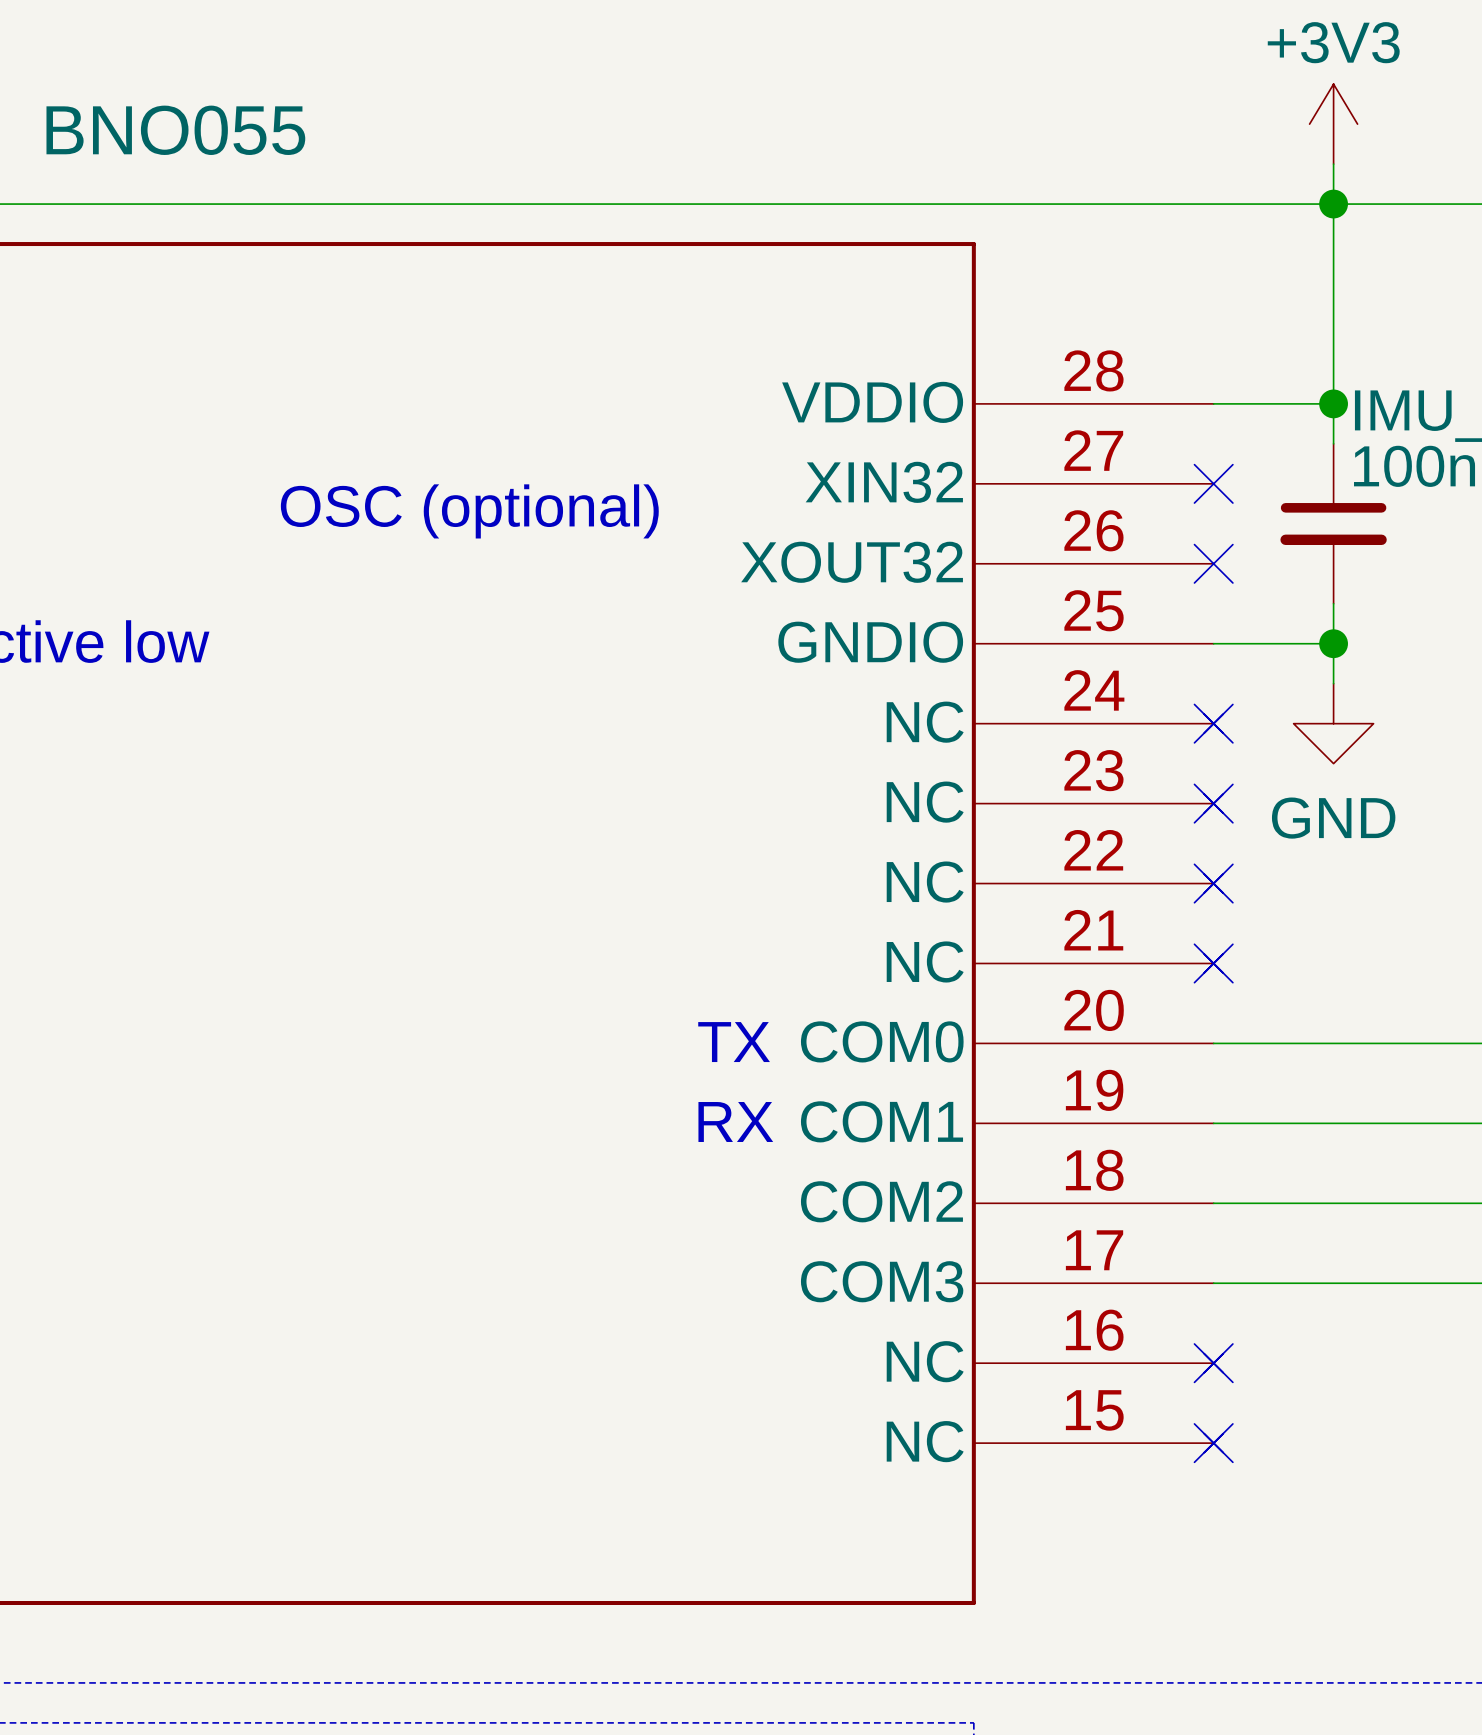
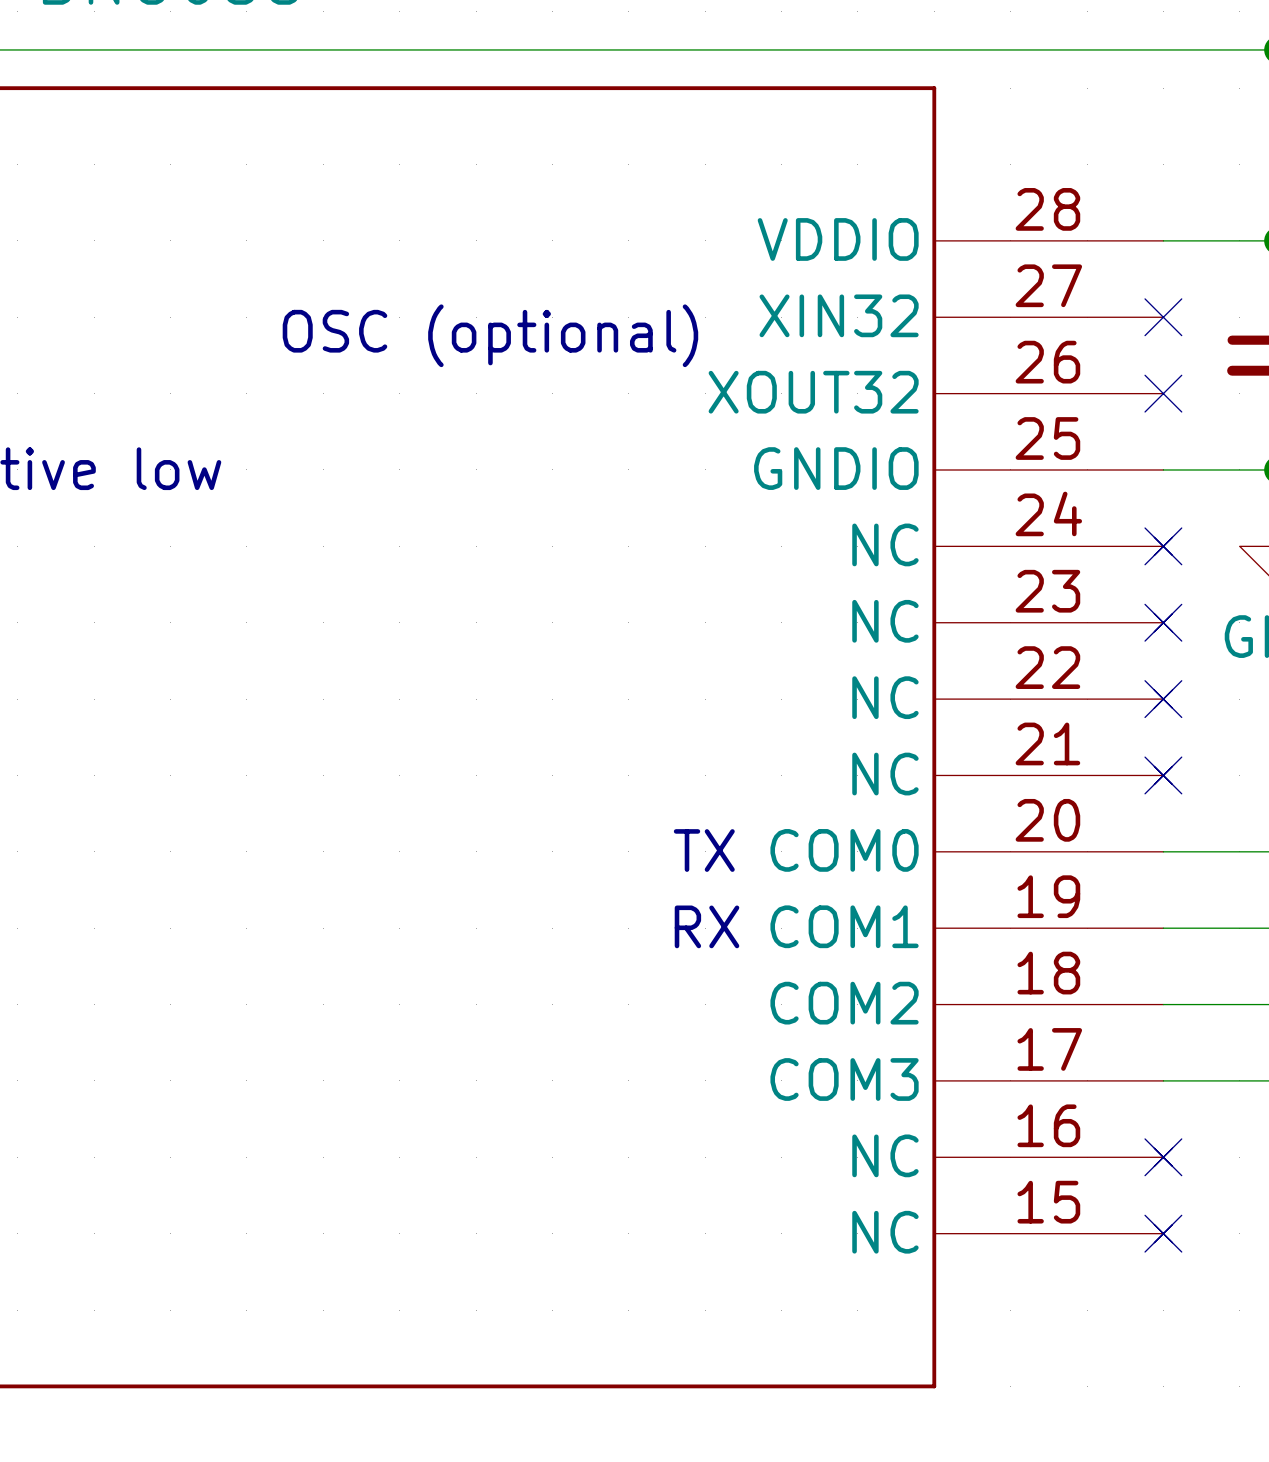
text position: OSC (optional) (469, 511) -> OSC (optional) (490, 335)

